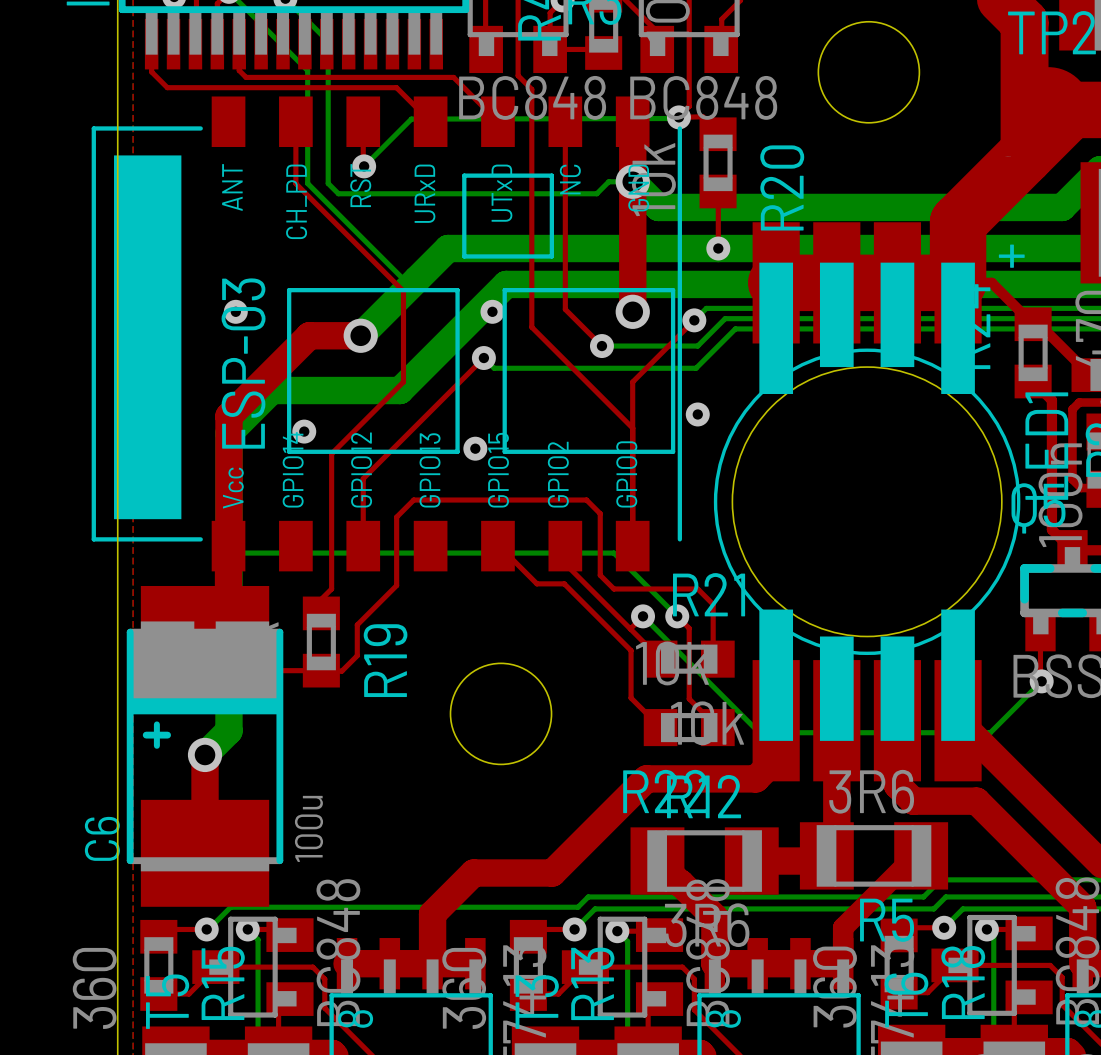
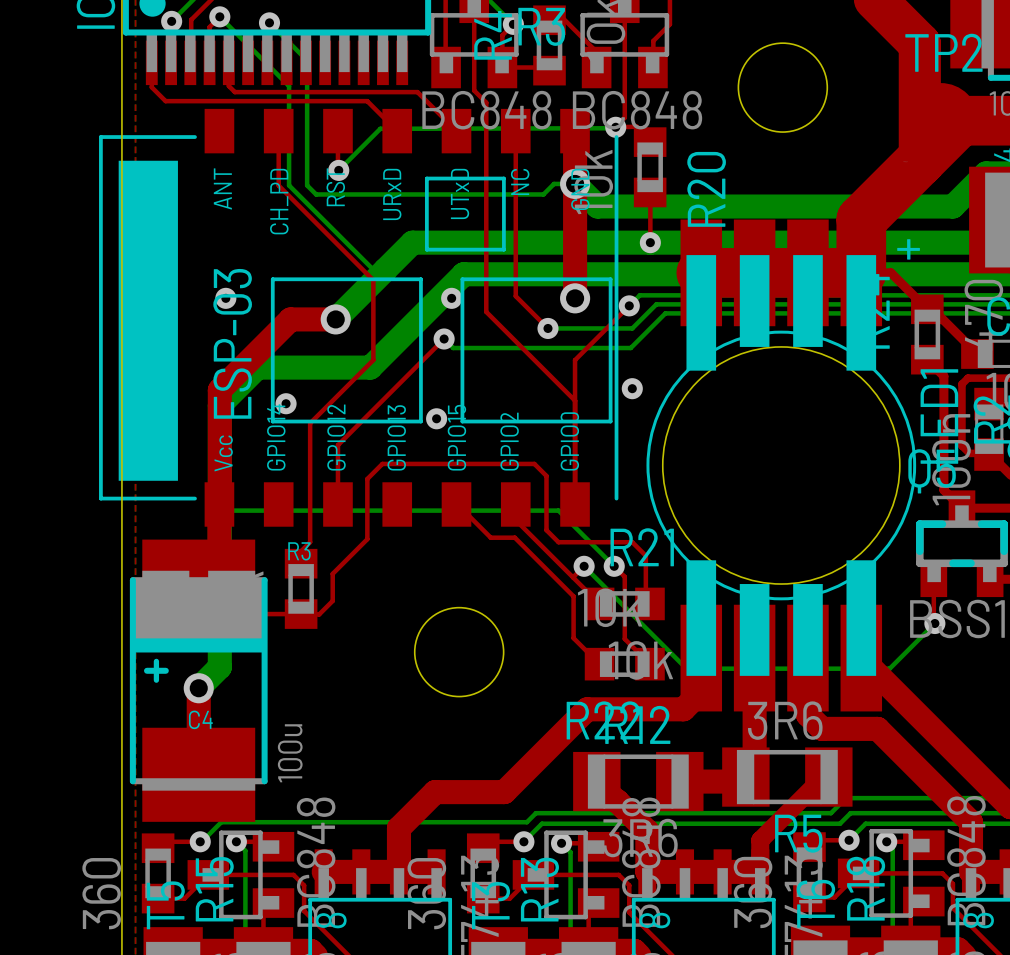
R19 name: R19 (385, 660) -> R3 (299, 551)
C6 name: C6 (102, 838) -> C4 (200, 719)

